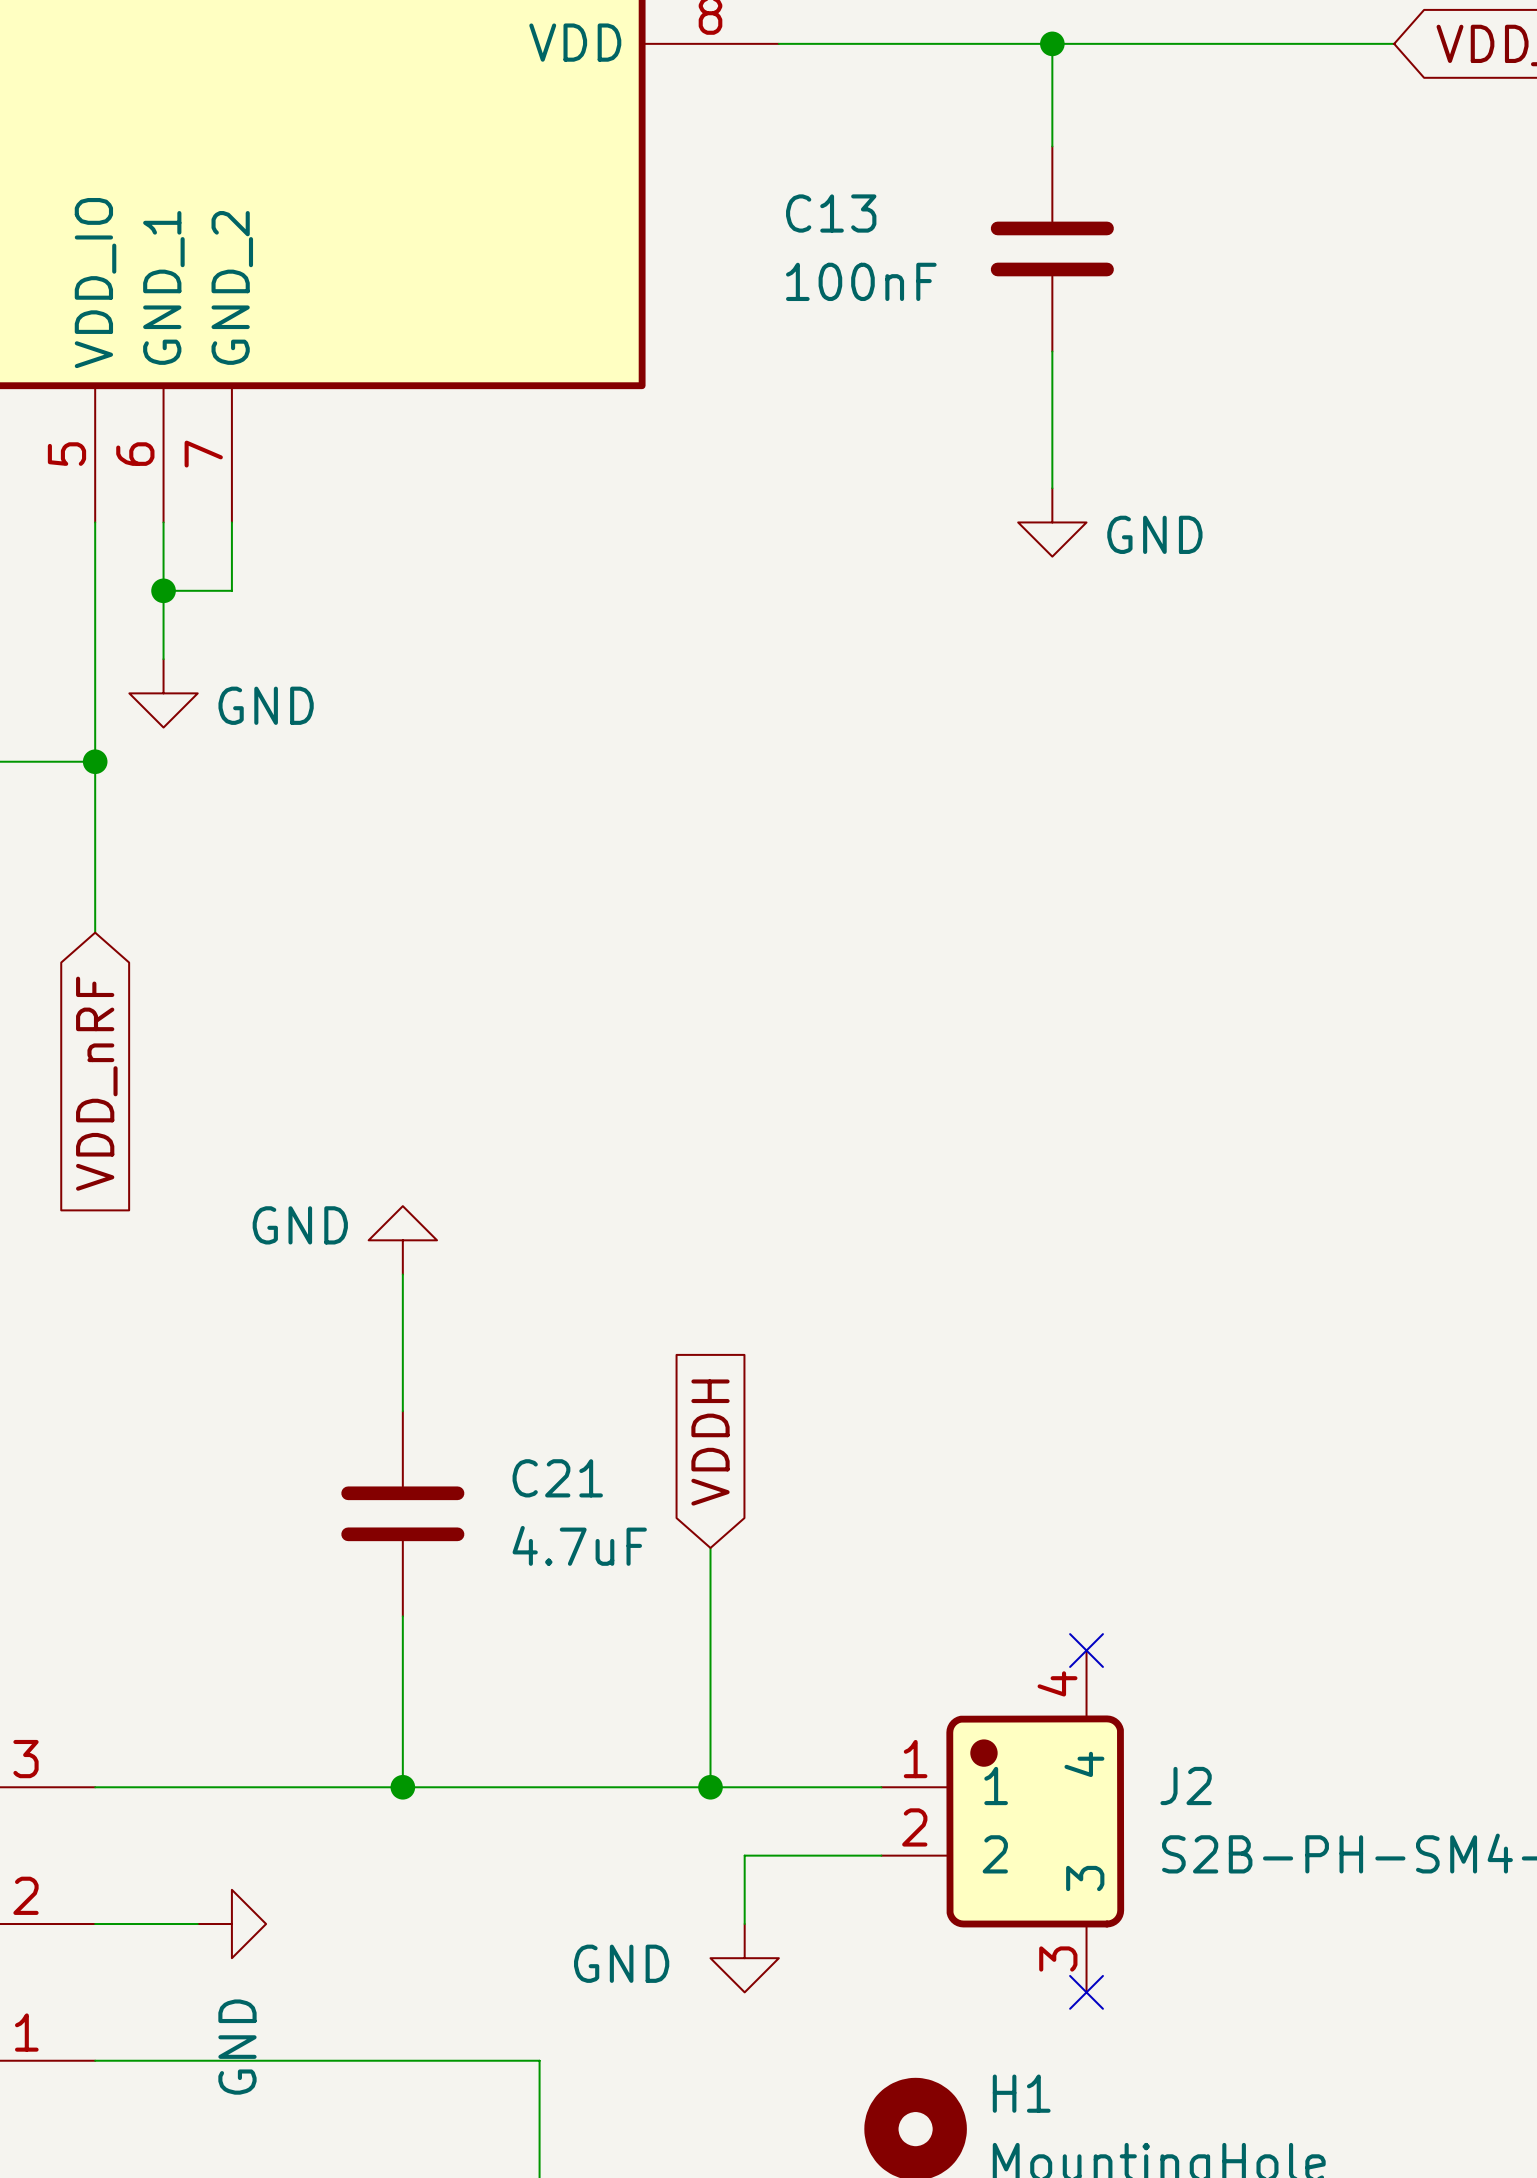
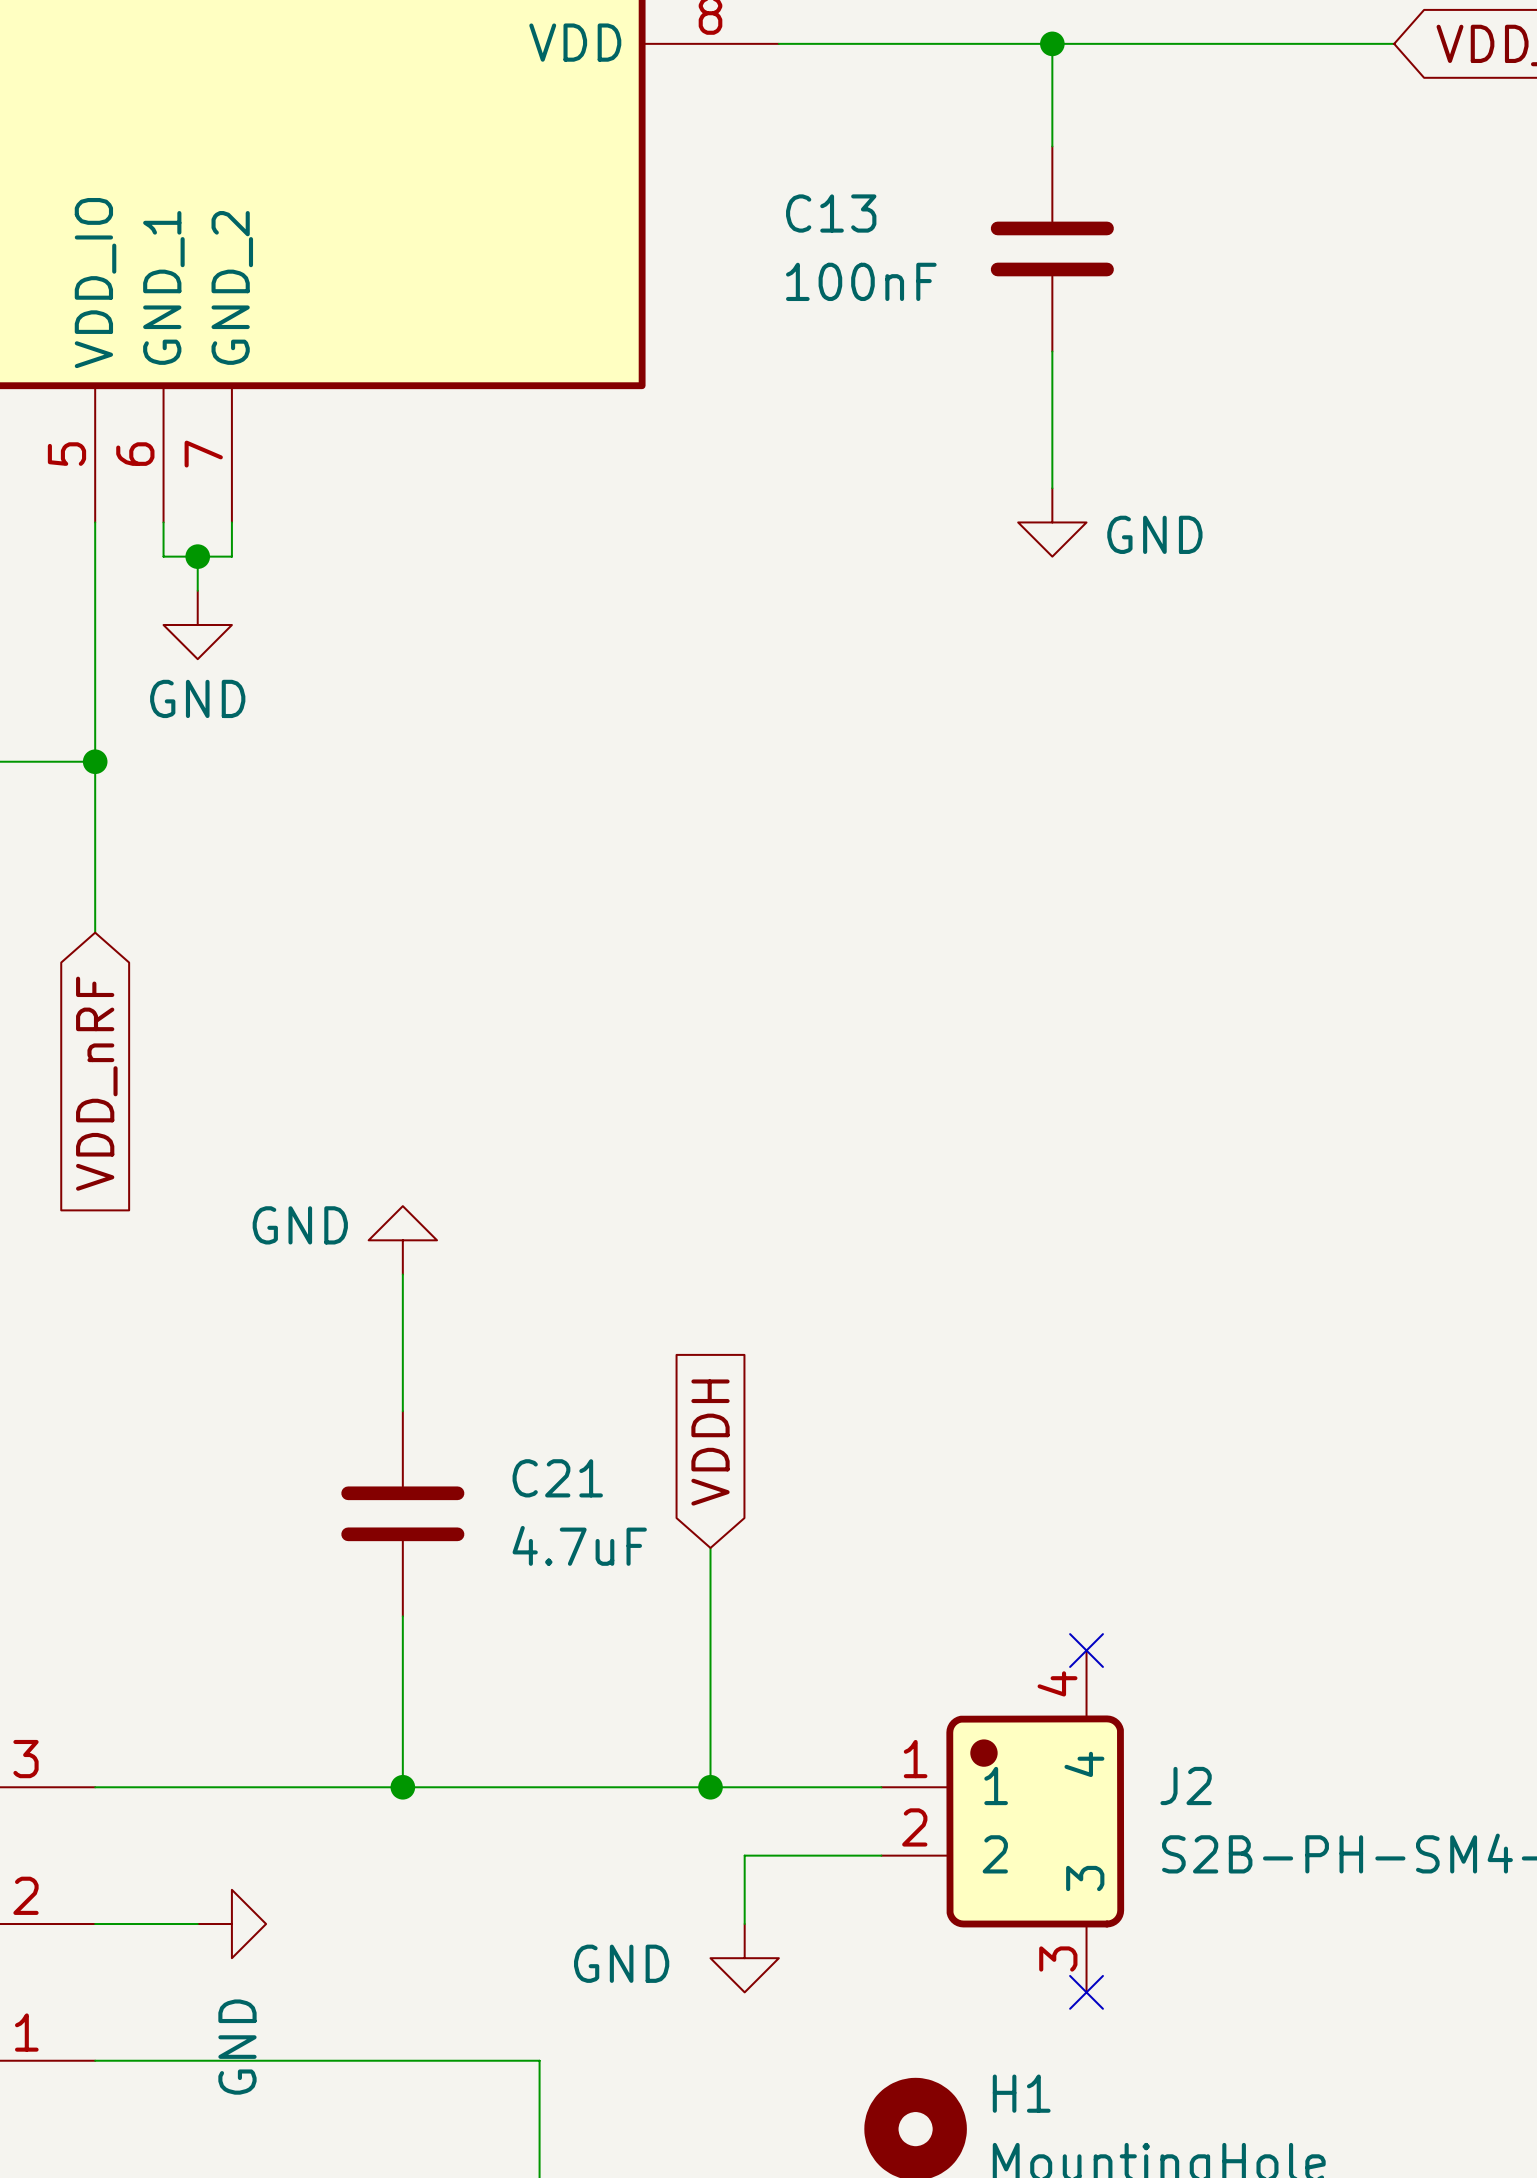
wire: (163, 556) (163, 659) -> none
wire: none -> (197, 556) (197, 590)
wire: (231, 556) (231, 590) (163, 590) -> (231, 556) (163, 556)
junction position: (163, 590) -> (197, 556)
power symbol position: GND (163, 693) -> GND (197, 625)
power symbol text position: GND (266, 705) -> GND (197, 698)

